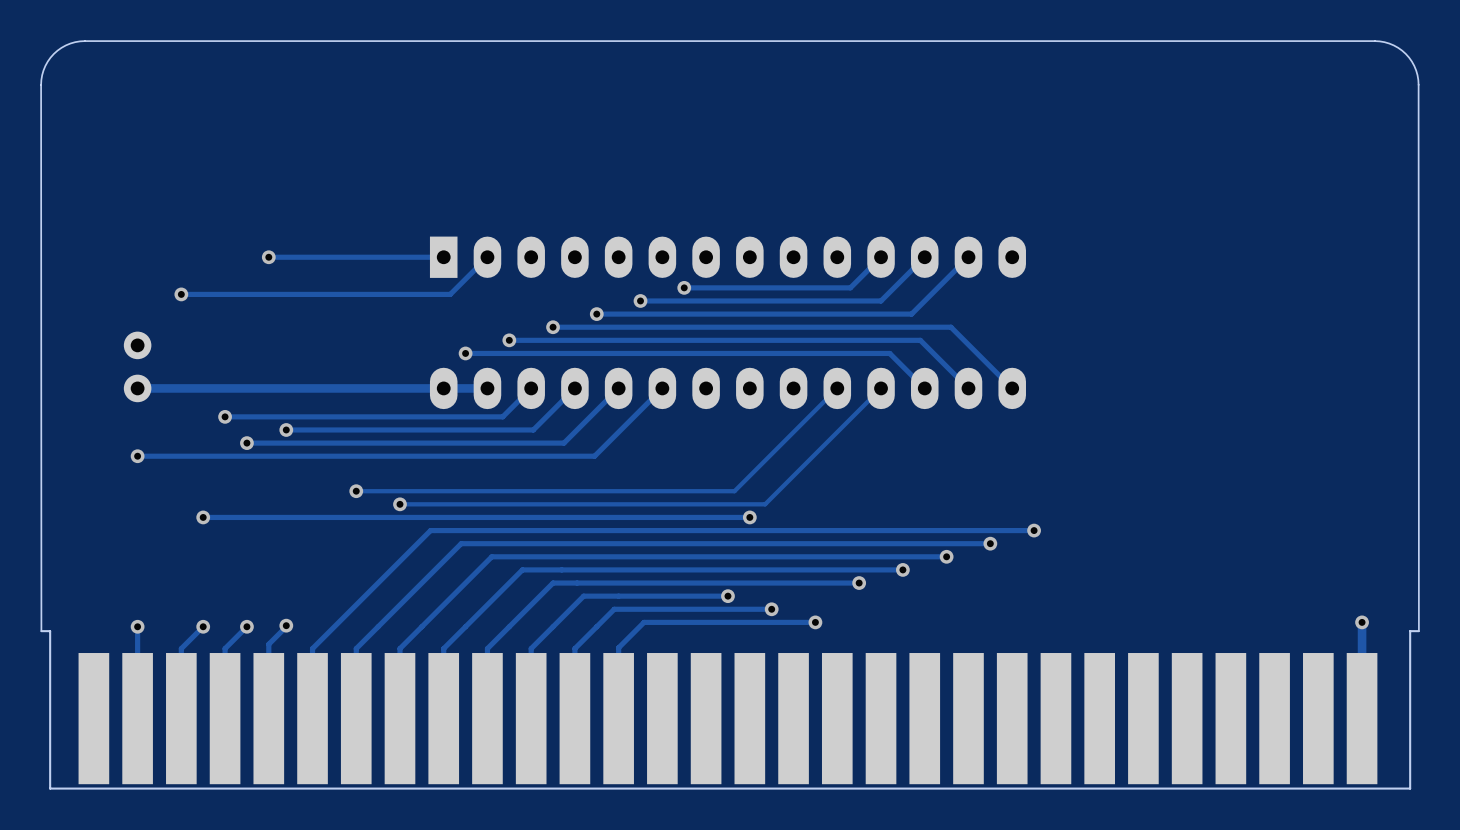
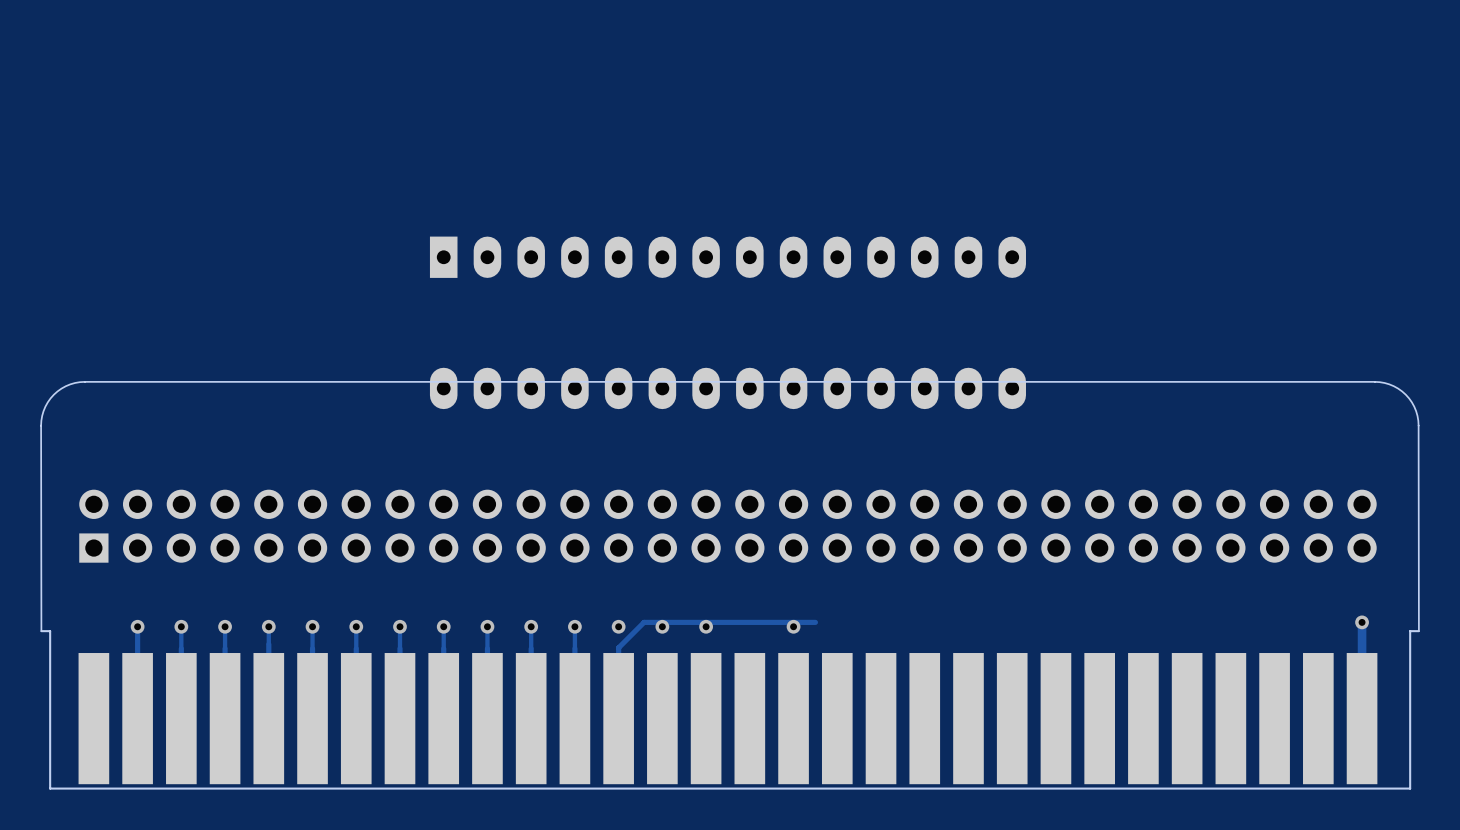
via: (268, 257) -> none
track: (443, 257) (268, 257) -> none
track: (487, 257) (450, 294) (181, 294) -> none
track: (881, 257) (850, 287) (684, 287) -> none
track: (924, 257) (881, 300) (640, 300) -> none
track: (968, 257) (911, 314) (596, 314) -> none
via: (684, 287) -> none
via: (181, 294) -> none
via: (640, 300) -> none
via: (596, 314) -> none
track: (553, 327) (950, 327) (1012, 388) -> none
via: (553, 327) -> none
track: (509, 340) (920, 340) (968, 388) -> none
via: (509, 340) -> none
track: (465, 353) (889, 353) (924, 388) -> none
via: (465, 353) -> none
part: (137, 366) -> none
track: (487, 388) (137, 388) -> none
track: (531, 388) (502, 416) (225, 416) -> none
track: (574, 388) (533, 429) (286, 429) -> none
track: (618, 388) (563, 443) (246, 443) -> none
track: (662, 388) (594, 456) (137, 456) -> none
track: (837, 388) (734, 491) (356, 491) -> none
track: (881, 388) (765, 504) (399, 504) -> none
via: (225, 416) -> none
via: (286, 429) -> none
via: (246, 443) -> none
via: (137, 456) -> none
via: (356, 491) -> none
via: (399, 504) -> none
via: (203, 517) -> none
track: (747, 517) (203, 517) -> none
via: (749, 517) -> none
part: none -> (727, 526)
track: (1034, 530) (430, 530) (312, 648) -> (312, 626) (312, 648)
via: (1034, 530) -> none
track: (990, 543) (461, 543) (356, 648) -> (356, 626) (356, 648)
via: (990, 543) -> none
track: (946, 556) (491, 556) (399, 648) -> (399, 626) (399, 648)
via: (946, 556) -> none
track: (902, 569) (522, 569) (443, 648) -> (443, 626) (443, 648)
via: (902, 569) -> none
track: (859, 583) (553, 583) (487, 648) -> (487, 626) (487, 648)
via: (859, 583) -> none
track: (727, 596) (583, 596) (531, 648) -> (531, 626) (531, 648)
via: (727, 596) -> none
track: (771, 609) (614, 609) (574, 648) -> (574, 626) (574, 648)
via: (771, 609) -> none
via: (815, 622) -> none
via: (286, 625) -> none
track: (287, 625) (268, 644) -> (268, 626) (268, 644)
via: none -> (181, 626)
track: (203, 626) (181, 648) -> (181, 626) (181, 648)
via: (203, 626) -> none
via: none -> (225, 626)
track: (246, 626) (225, 648) -> (225, 626) (225, 648)
via: (246, 626) -> none
via: none -> (268, 626)
via: none -> (312, 626)
via: none -> (356, 626)
via: none -> (399, 626)
via: none -> (443, 626)
via: none -> (487, 626)
via: none -> (531, 626)
via: none -> (574, 626)
via: none -> (618, 626)
via: none -> (662, 626)
via: none -> (706, 626)
via: none -> (793, 626)
board edge: (1418, 631) (1418, 79) (1414, 65) (1405, 53) (1393, 45) (1374, 41) (84, 41) (65, 45) (57, 50) (47, 61) (43, 70) (41, 84) (41, 631) -> (1418, 631) (1417, 415) (1411, 402) (1402, 391) (1389, 384) (1374, 381) (75, 382) (61, 388) (53, 394) (45, 406) (41, 420) (41, 631)

